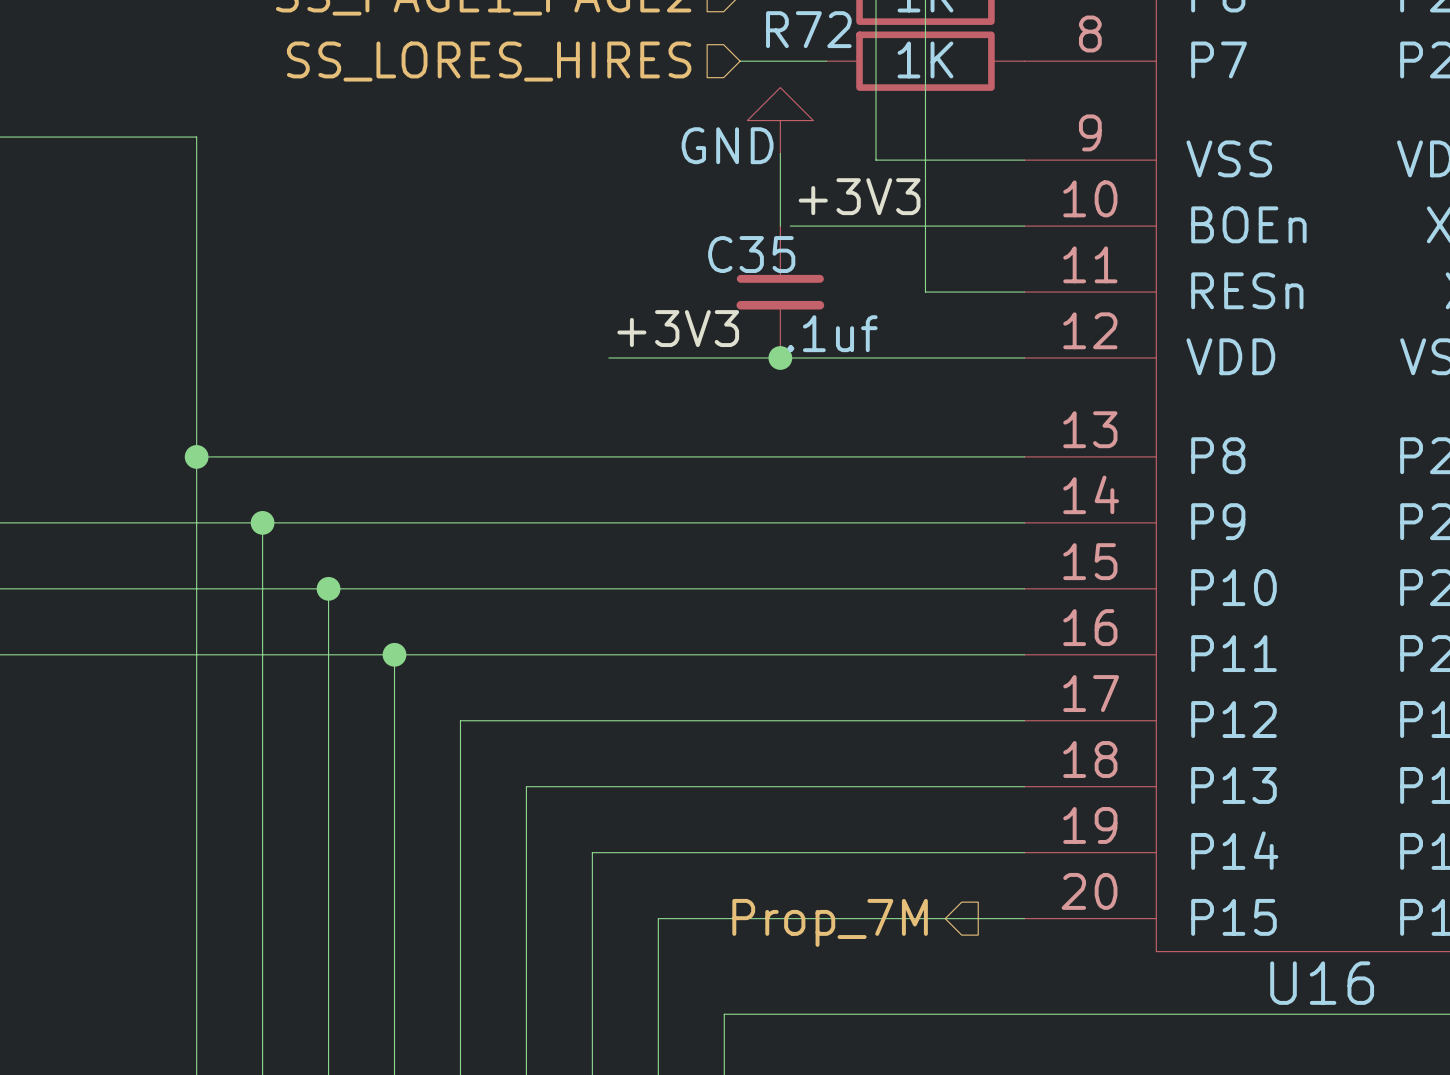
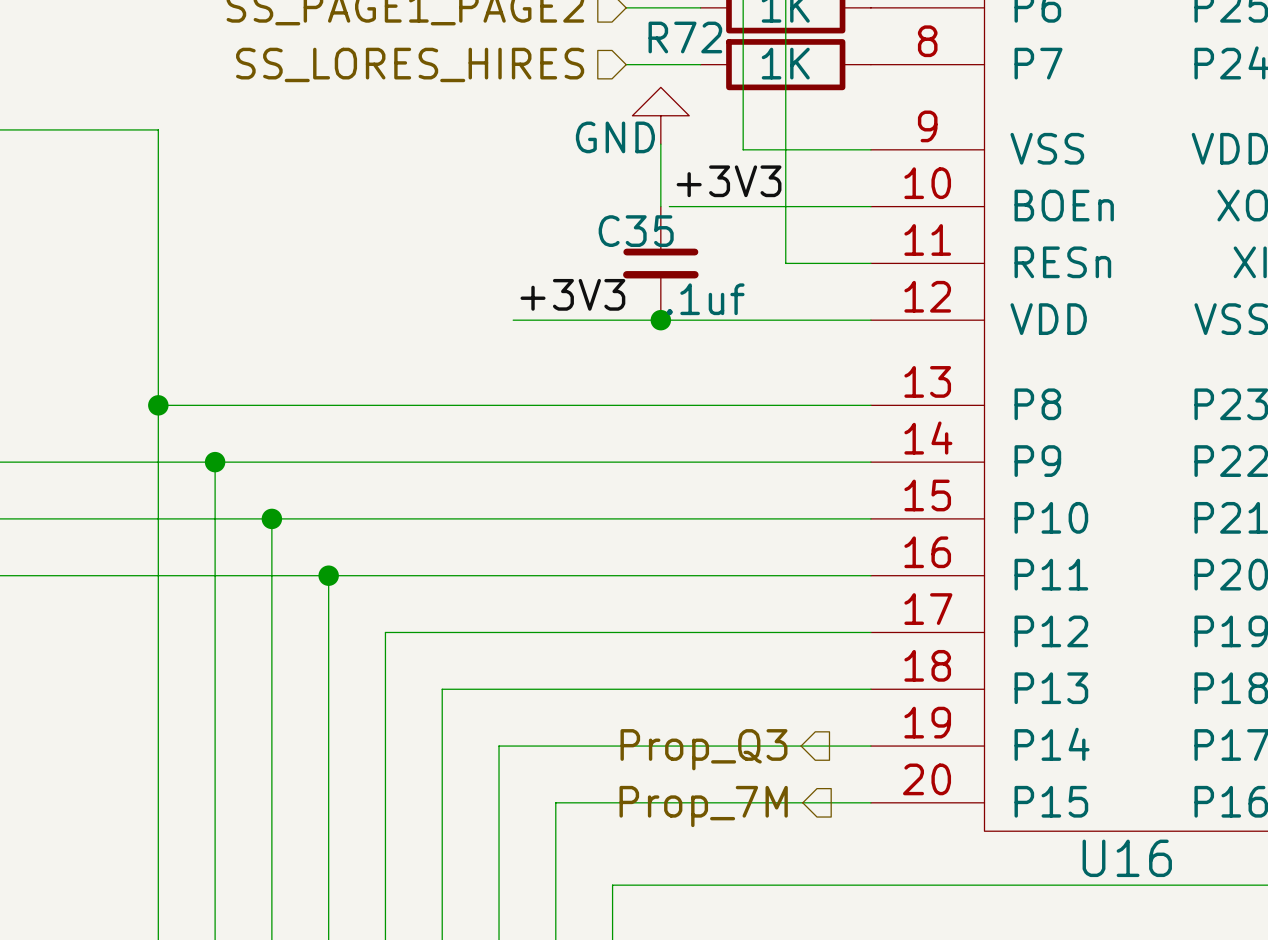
hierarchical label: none -> Prop_Q3 (703, 749)

